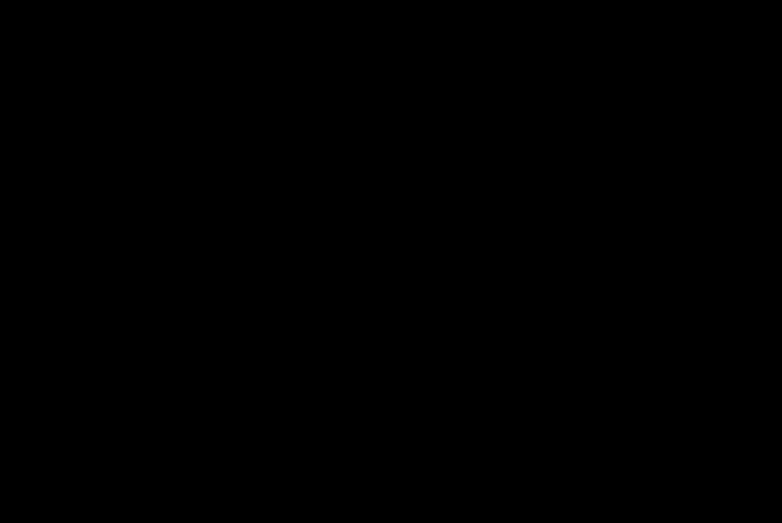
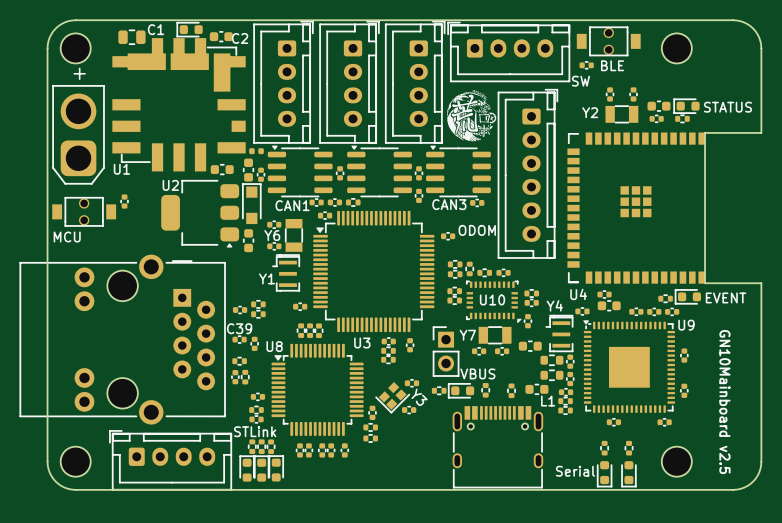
board edge: none -> (75, 20) (733, 20) (750, 26) (757, 34) (761, 44) (761, 132) (705, 132) (705, 283) (761, 283) (761, 461) (755, 478) (747, 486) (733, 489) (75, 489) (58, 484) (51, 475) (47, 461) (47, 48) (49, 37) (55, 28) (64, 22) (75, 20)
part: none -> (189, 29)
C2: none -> (221, 36)
C1: none -> (131, 37)
part: none -> (608, 41)
part: none -> (75, 48)
part: none -> (676, 48)
part: none -> (508, 51)
part: none -> (586, 65)
text: none -> BLE (612, 65)
text: none -> SW (580, 81)
part: none -> (283, 82)
part: none -> (349, 82)
part: none -> (415, 82)
drawing: none -> [446, 89, 497, 142]
part: none -> (610, 94)
part: none -> (633, 94)
U1: none -> (179, 104)
part: none -> (658, 106)
part: none -> (686, 106)
text: none -> STATUS (727, 107)
Y2: none -> (621, 114)
part: none -> (656, 118)
part: none -> (682, 118)
part: none -> (78, 134)
part: none -> (256, 151)
part: none -> (222, 169)
part: none -> (248, 170)
part: none -> (300, 171)
part: none -> (379, 171)
part: none -> (458, 171)
part: none -> (340, 173)
part: none -> (419, 173)
part: none -> (527, 173)
part: none -> (261, 174)
part: none -> (419, 195)
part: none -> (124, 201)
part: none -> (316, 202)
part: none -> (334, 202)
part: none -> (353, 202)
part: none -> (477, 202)
part: none -> (251, 203)
text: none -> CAN3 (449, 204)
text: none -> CAN1 (292, 205)
U4: none -> (636, 208)
part: none -> (84, 211)
U2: none -> (200, 213)
part: none -> (325, 215)
part: none -> (274, 224)
text: none -> ODOM (477, 230)
Y6: none -> (293, 235)
part: none -> (448, 236)
text: none -> MCU (67, 237)
part: none -> (248, 240)
part: none -> (274, 246)
part: none -> (455, 264)
part: none -> (469, 268)
U3: none -> (373, 271)
Y1: none -> (286, 272)
part: none -> (484, 272)
part: none -> (503, 272)
part: none -> (455, 274)
part: none -> (454, 291)
part: none -> (531, 293)
part: none -> (604, 294)
part: none -> (688, 296)
text: none -> EVENT (726, 297)
part: none -> (665, 298)
part: none -> (454, 300)
U10: none -> (493, 301)
part: none -> (531, 302)
part: none -> (258, 304)
part: none -> (609, 305)
part: none -> (300, 306)
part: none -> (240, 310)
part: none -> (582, 311)
part: none -> (636, 311)
part: none -> (654, 311)
part: none -> (672, 311)
part: none -> (258, 314)
part: none -> (527, 321)
part: none -> (301, 330)
part: none -> (310, 330)
part: none -> (318, 330)
Y4: none -> (559, 333)
Y7: none -> (495, 335)
part: none -> (122, 339)
C39: none -> (239, 339)
part: none -> (388, 341)
part: none -> (254, 343)
part: none -> (410, 345)
part: none -> (530, 346)
part: none -> (388, 350)
part: none -> (446, 351)
part: none -> (479, 351)
part: none -> (502, 351)
part: none -> (684, 355)
part: none -> (388, 359)
part: none -> (551, 360)
part: none -> (239, 361)
part: none -> (570, 361)
U9: none -> (629, 366)
text: none -> VBUS (477, 373)
part: none -> (551, 375)
part: none -> (235, 377)
part: none -> (245, 377)
part: none -> (570, 379)
part: none -> (411, 383)
U8: none -> (317, 389)
L1: none -> (536, 389)
part: none -> (439, 390)
part: none -> (461, 390)
part: none -> (485, 390)
part: none -> (511, 390)
part: none -> (684, 390)
part: none -> (566, 392)
text: none -> GN10Mainboard v2.5 (724, 401)
part: none -> (257, 396)
Y3: none -> (392, 397)
part: none -> (565, 401)
part: none -> (256, 410)
part: none -> (409, 410)
part: none -> (565, 410)
part: none -> (372, 412)
part: none -> (256, 419)
part: none -> (613, 422)
part: none -> (664, 422)
part: none -> (370, 427)
text: none -> STLink (255, 431)
part: none -> (370, 438)
part: none -> (252, 446)
part: none -> (261, 446)
part: none -> (271, 446)
part: none -> (497, 447)
part: none -> (604, 448)
part: none -> (629, 448)
part: none -> (300, 450)
part: none -> (308, 450)
part: none -> (322, 450)
part: none -> (331, 450)
part: none -> (344, 450)
part: none -> (170, 460)
part: none -> (75, 461)
part: none -> (676, 461)
part: none -> (247, 468)
part: none -> (261, 468)
part: none -> (276, 468)
text: none -> Serial (575, 471)
part: none -> (604, 474)
part: none -> (628, 474)

